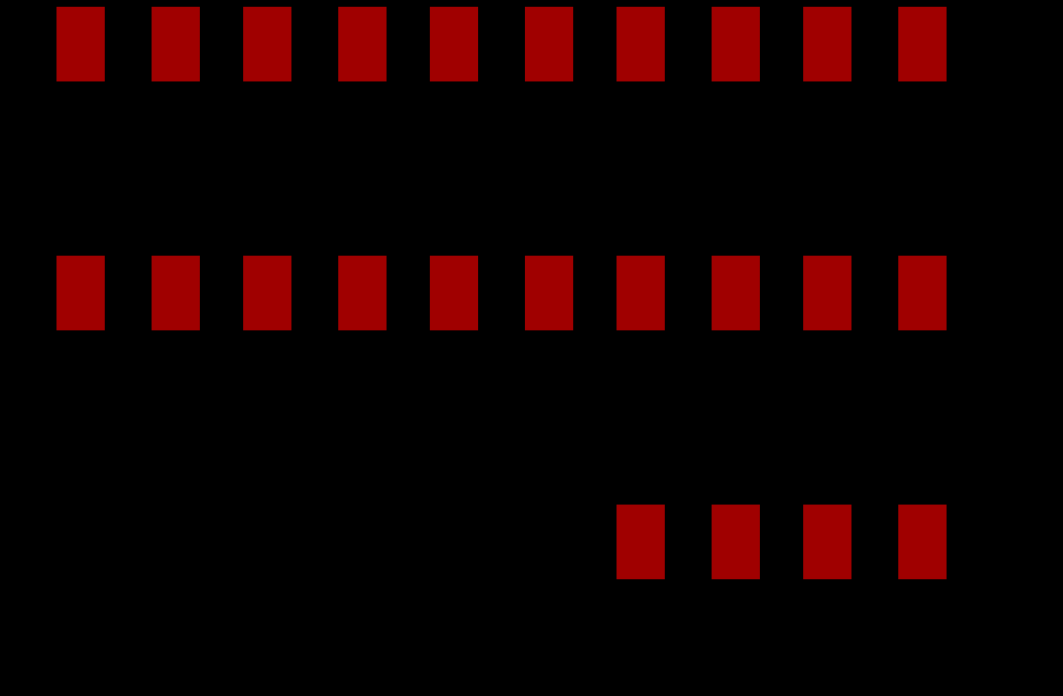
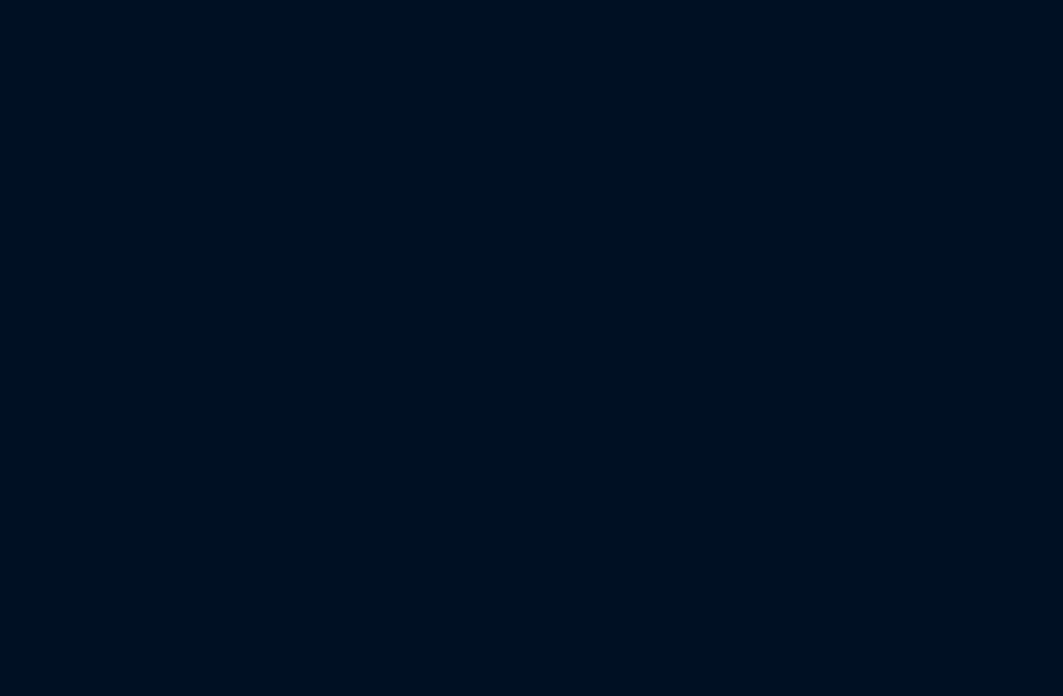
part: (128, 44) -> none
part: (314, 44) -> none
part: (501, 44) -> none
part: (688, 44) -> none
part: (874, 44) -> none
part: (128, 293) -> none
part: (314, 293) -> none
part: (501, 293) -> none
part: (688, 293) -> none
part: (874, 293) -> none
part: (688, 541) -> none
part: (874, 541) -> none

